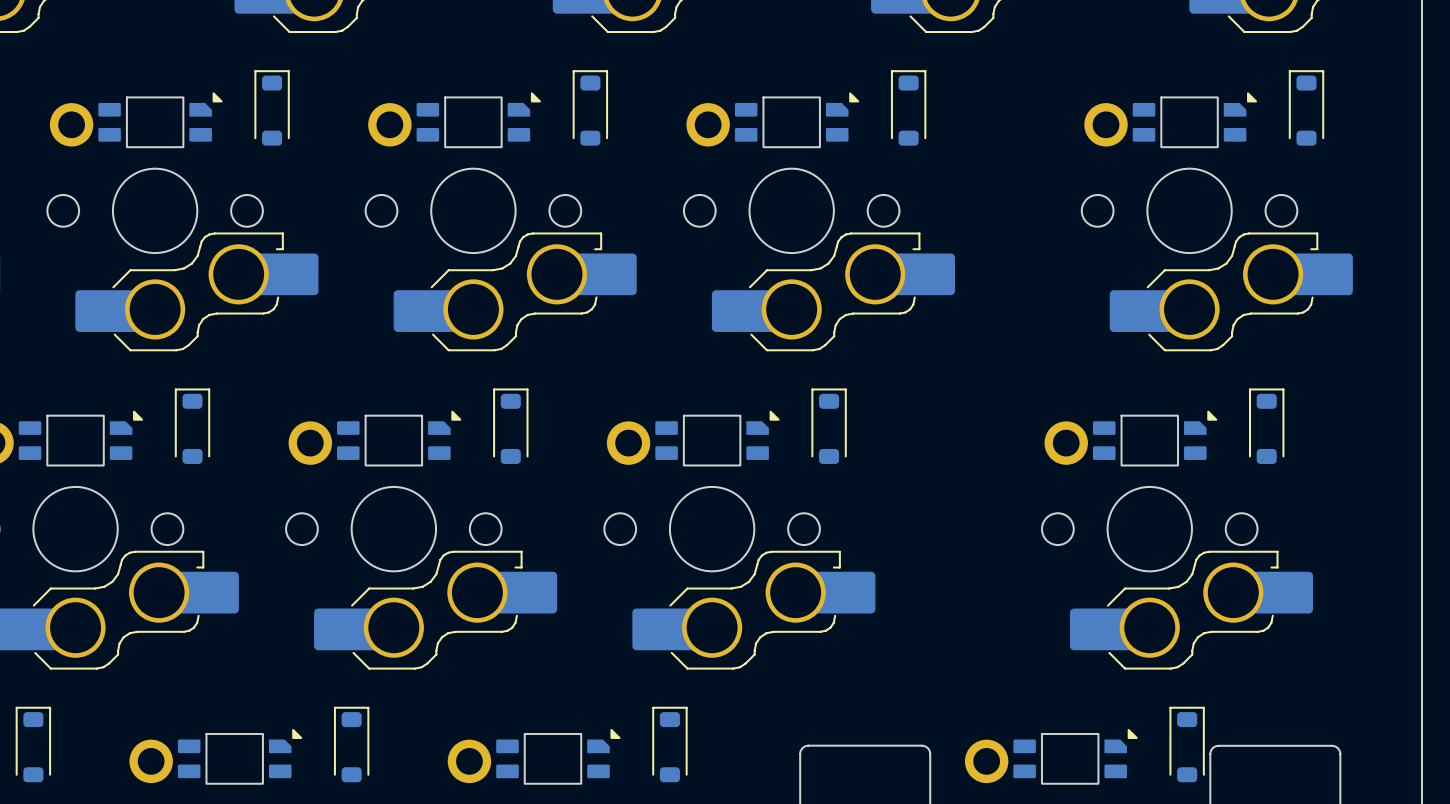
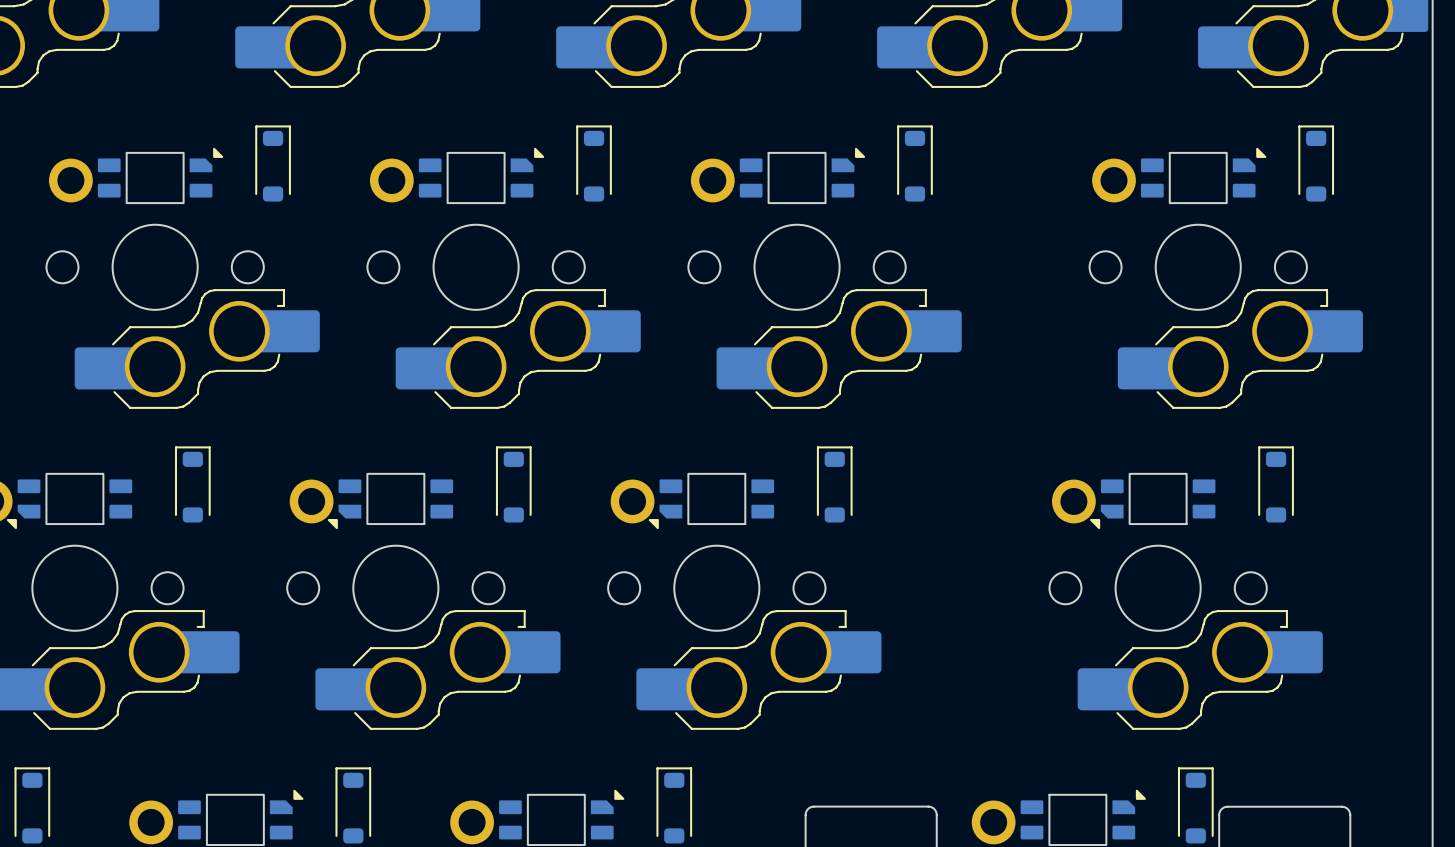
part rotation: 0° (80, 438) -> 180° (69, 501)
part rotation: 0° (399, 438) -> 180° (390, 501)
part rotation: 0° (717, 438) -> 180° (711, 501)
part rotation: 0° (1155, 438) -> 180° (1152, 501)

